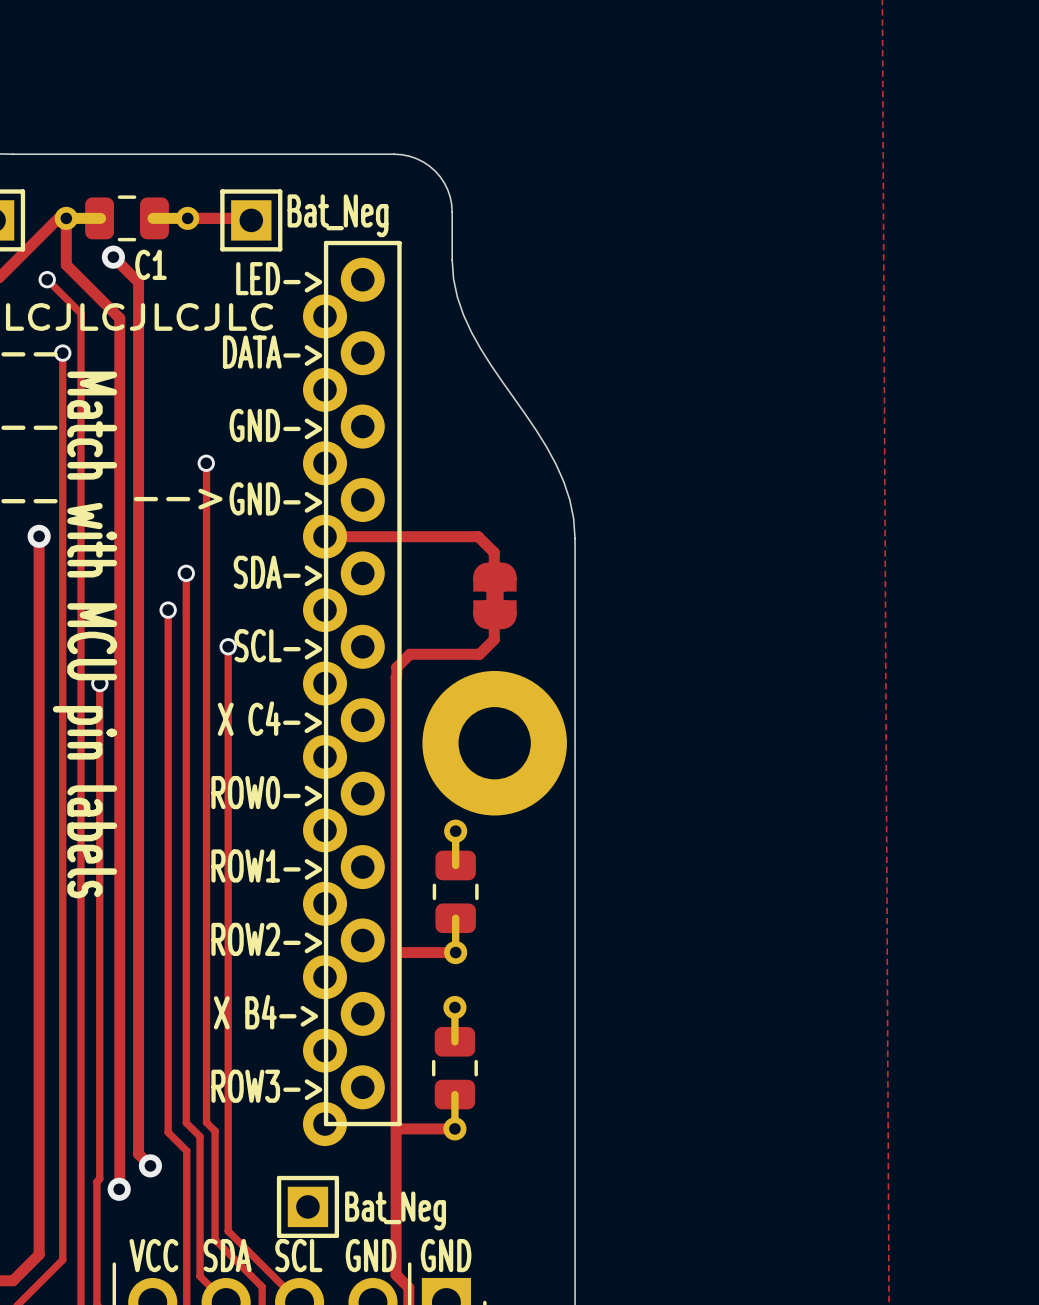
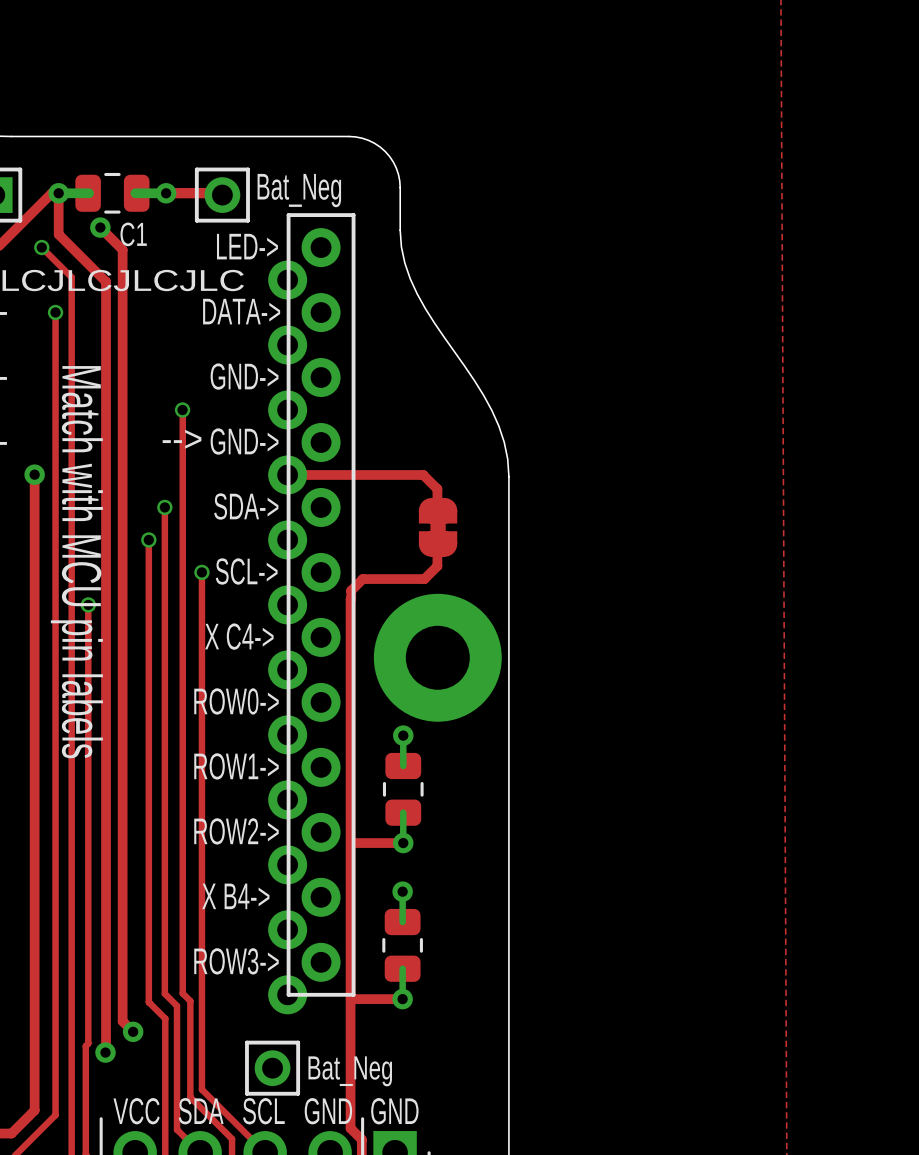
part footprint: [220, 189, 283, 252] -> [194, 167, 250, 223]
part footprint: [276, 1175, 340, 1239] -> [245, 1040, 301, 1096]

